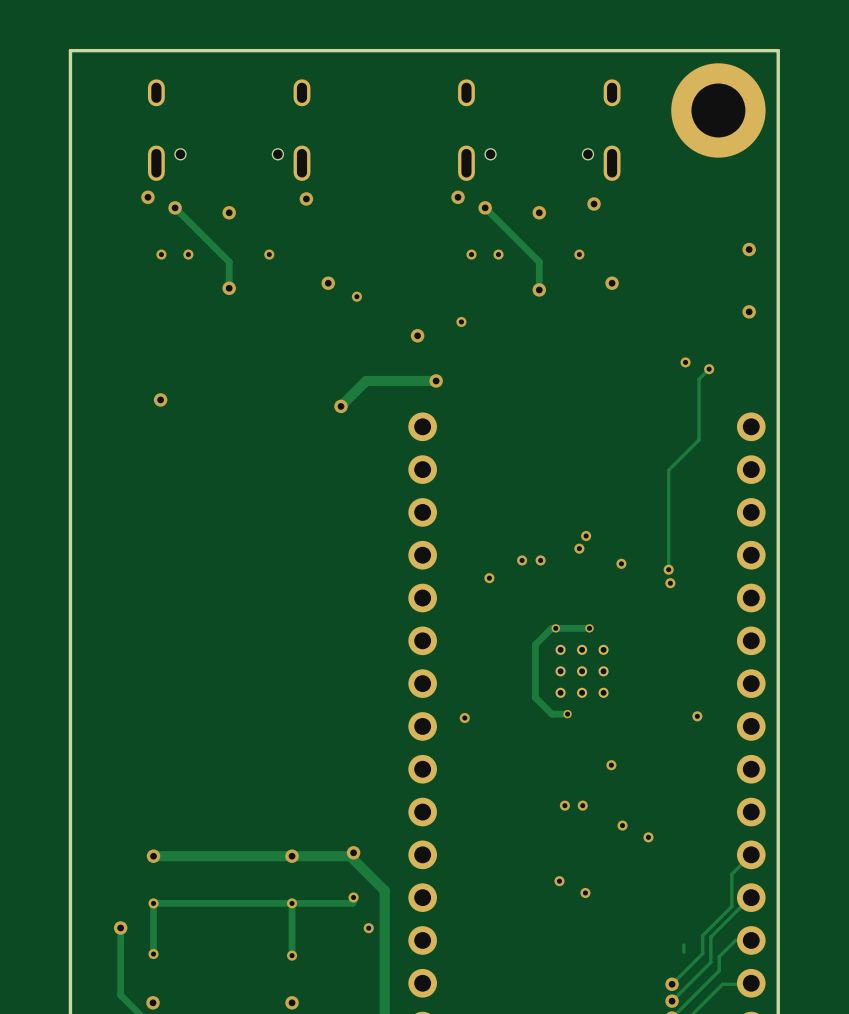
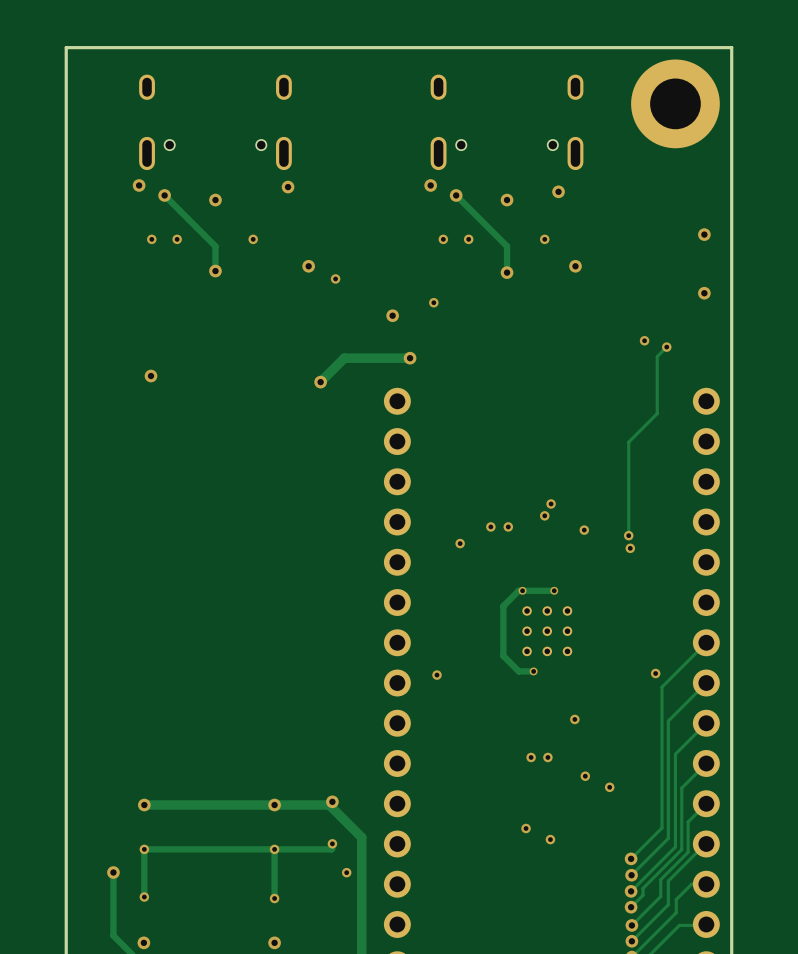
track: none -> (706, 642) (661, 687) (661, 827) (631, 858)
track: none -> (706, 683) (668, 721) (668, 838) (631, 875)
track: none -> (706, 723) (675, 754) (675, 847) (631, 891)
track: none -> (706, 763) (681, 788) (681, 849) (642, 888)
via: none -> (631, 858)
via: none -> (631, 875)
via: none -> (631, 891)
track: none -> (642, 895) (631, 907)
via: none -> (631, 907)

